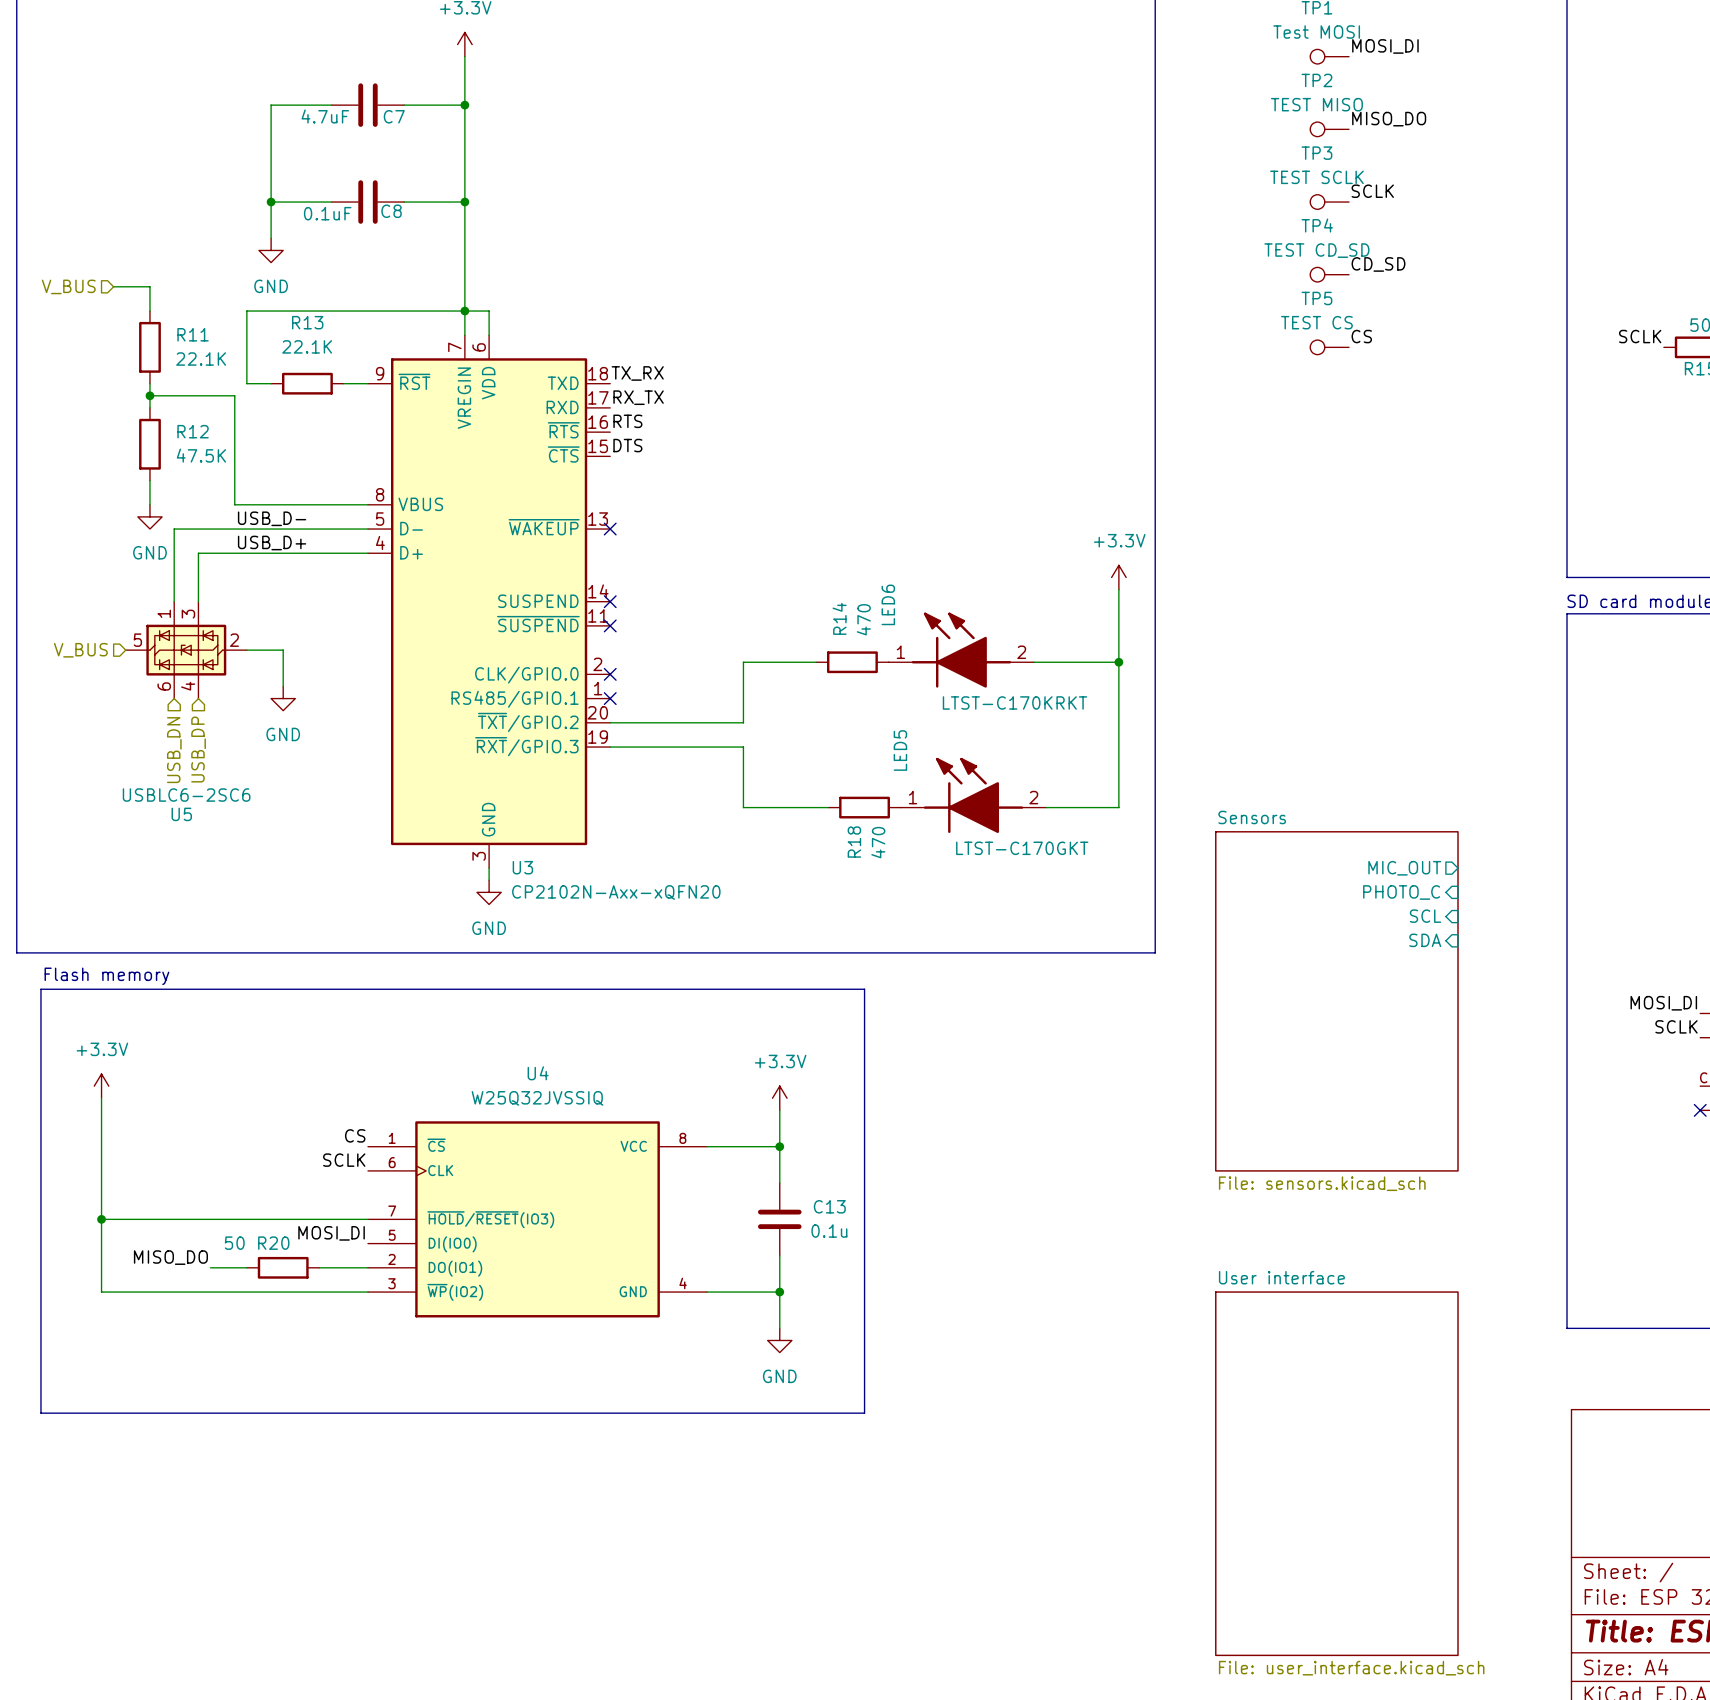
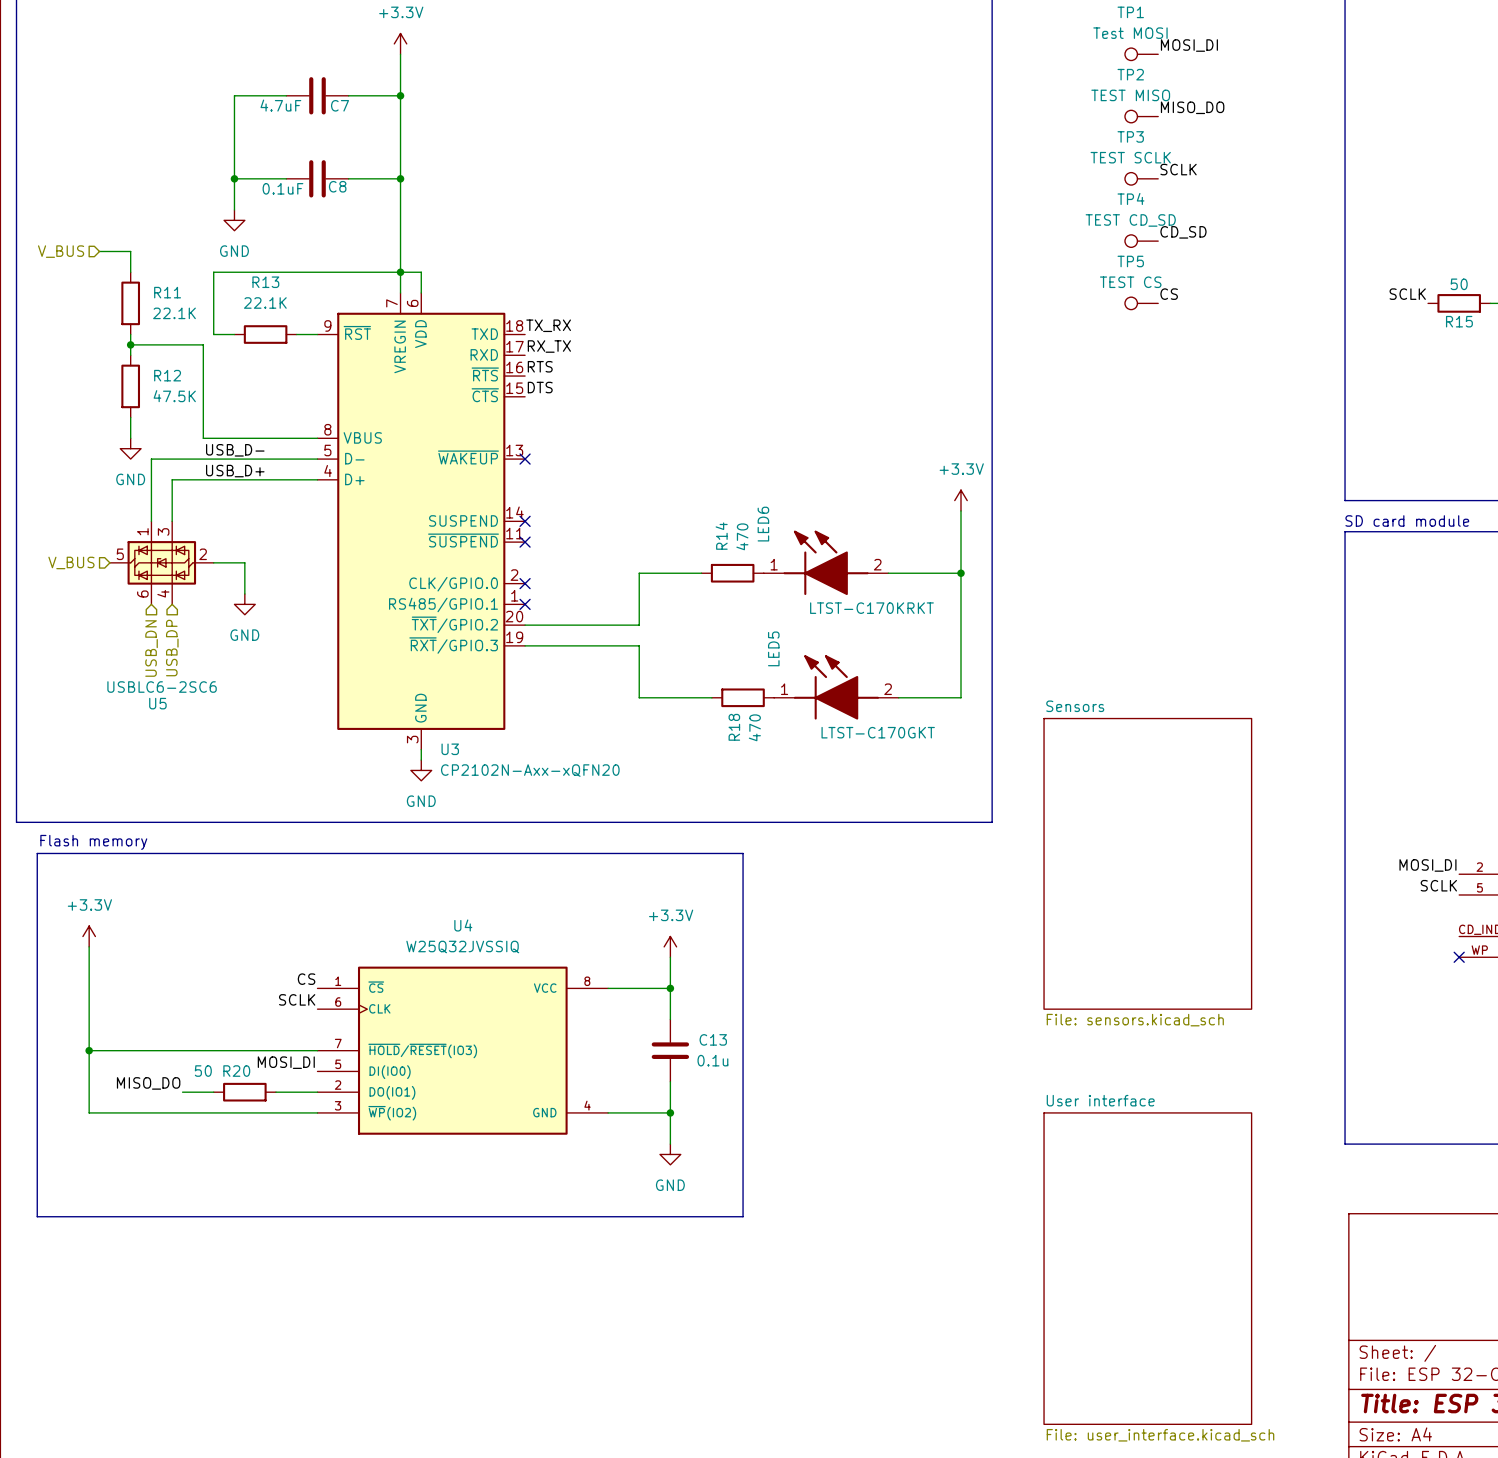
sheet pin: MIC_OUT (1404, 868) -> none
sheet pin: PHOTO_C (1401, 892) -> none
sheet pin: SCL (1425, 916) -> none
sheet pin: SDA (1425, 940) -> none

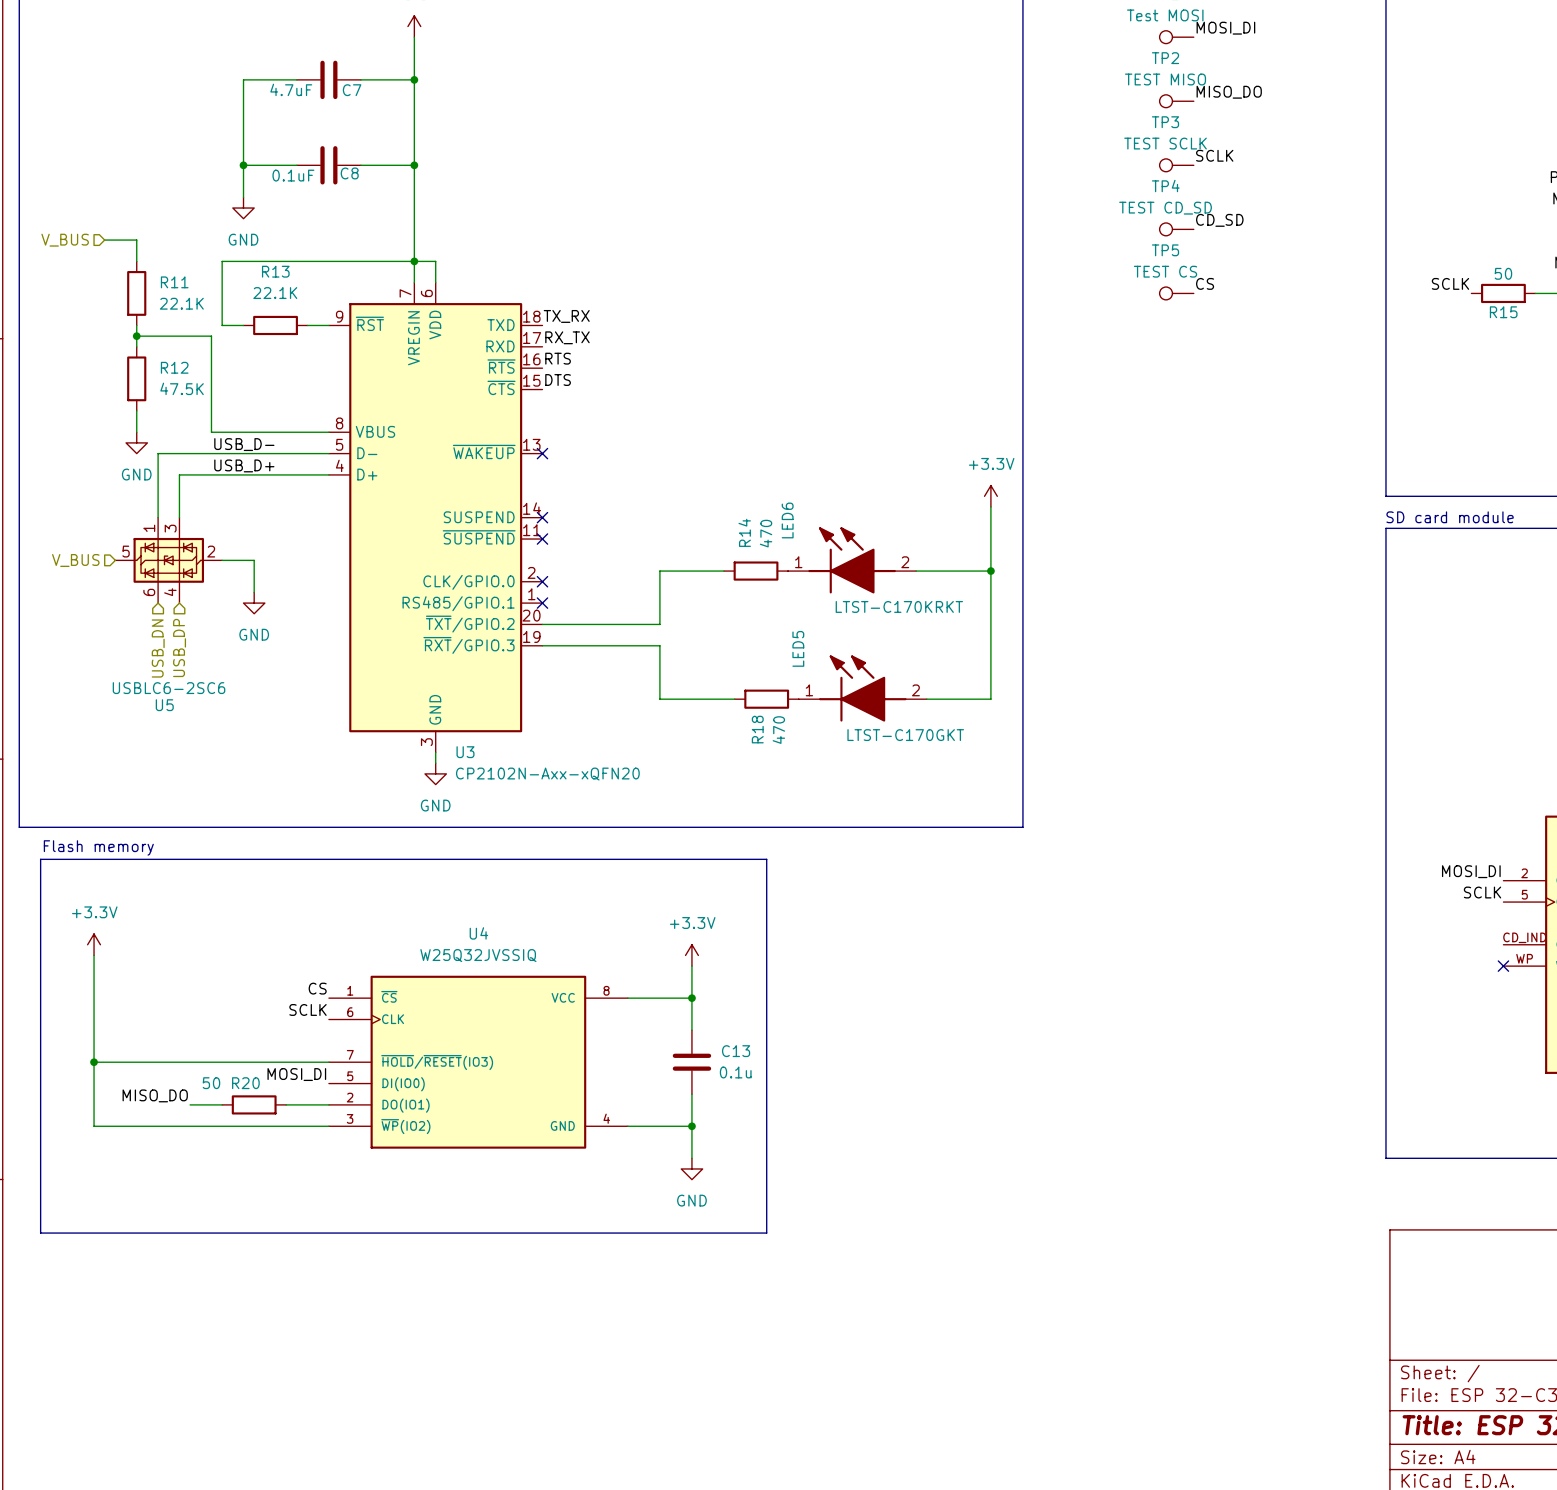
sheet Sensors: File: sensors.kicad_sch (1147, 863) -> none
sheet User interface: File: user_interface.kicad_sch (1147, 1268) -> none

